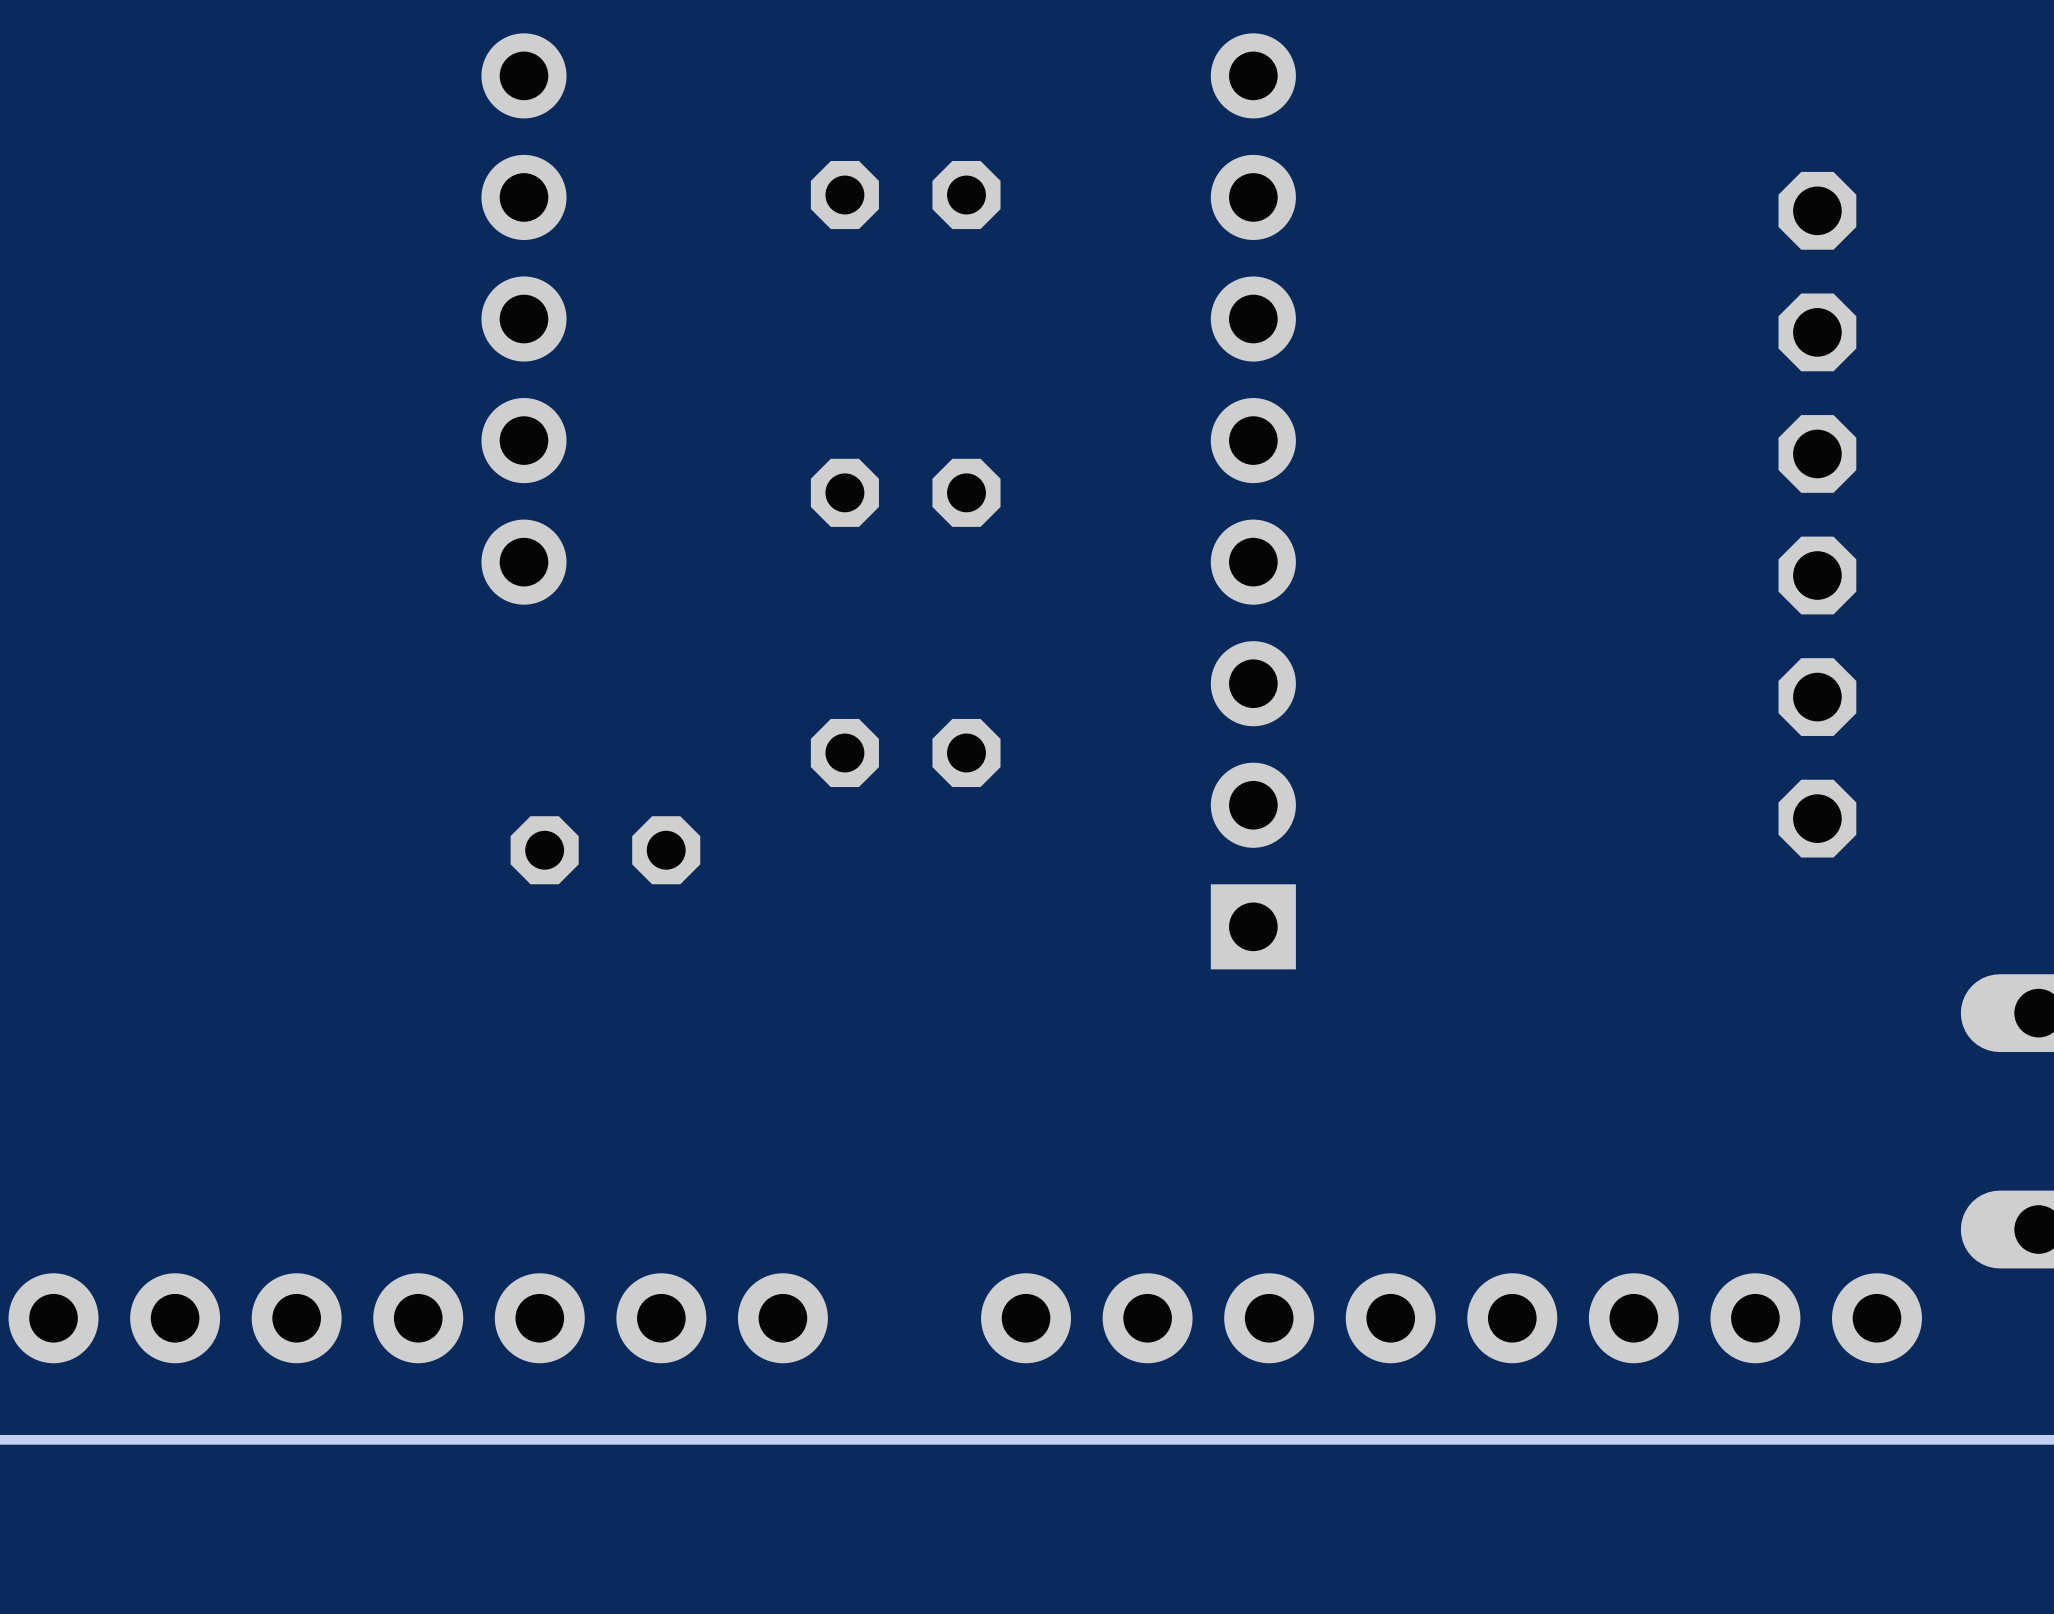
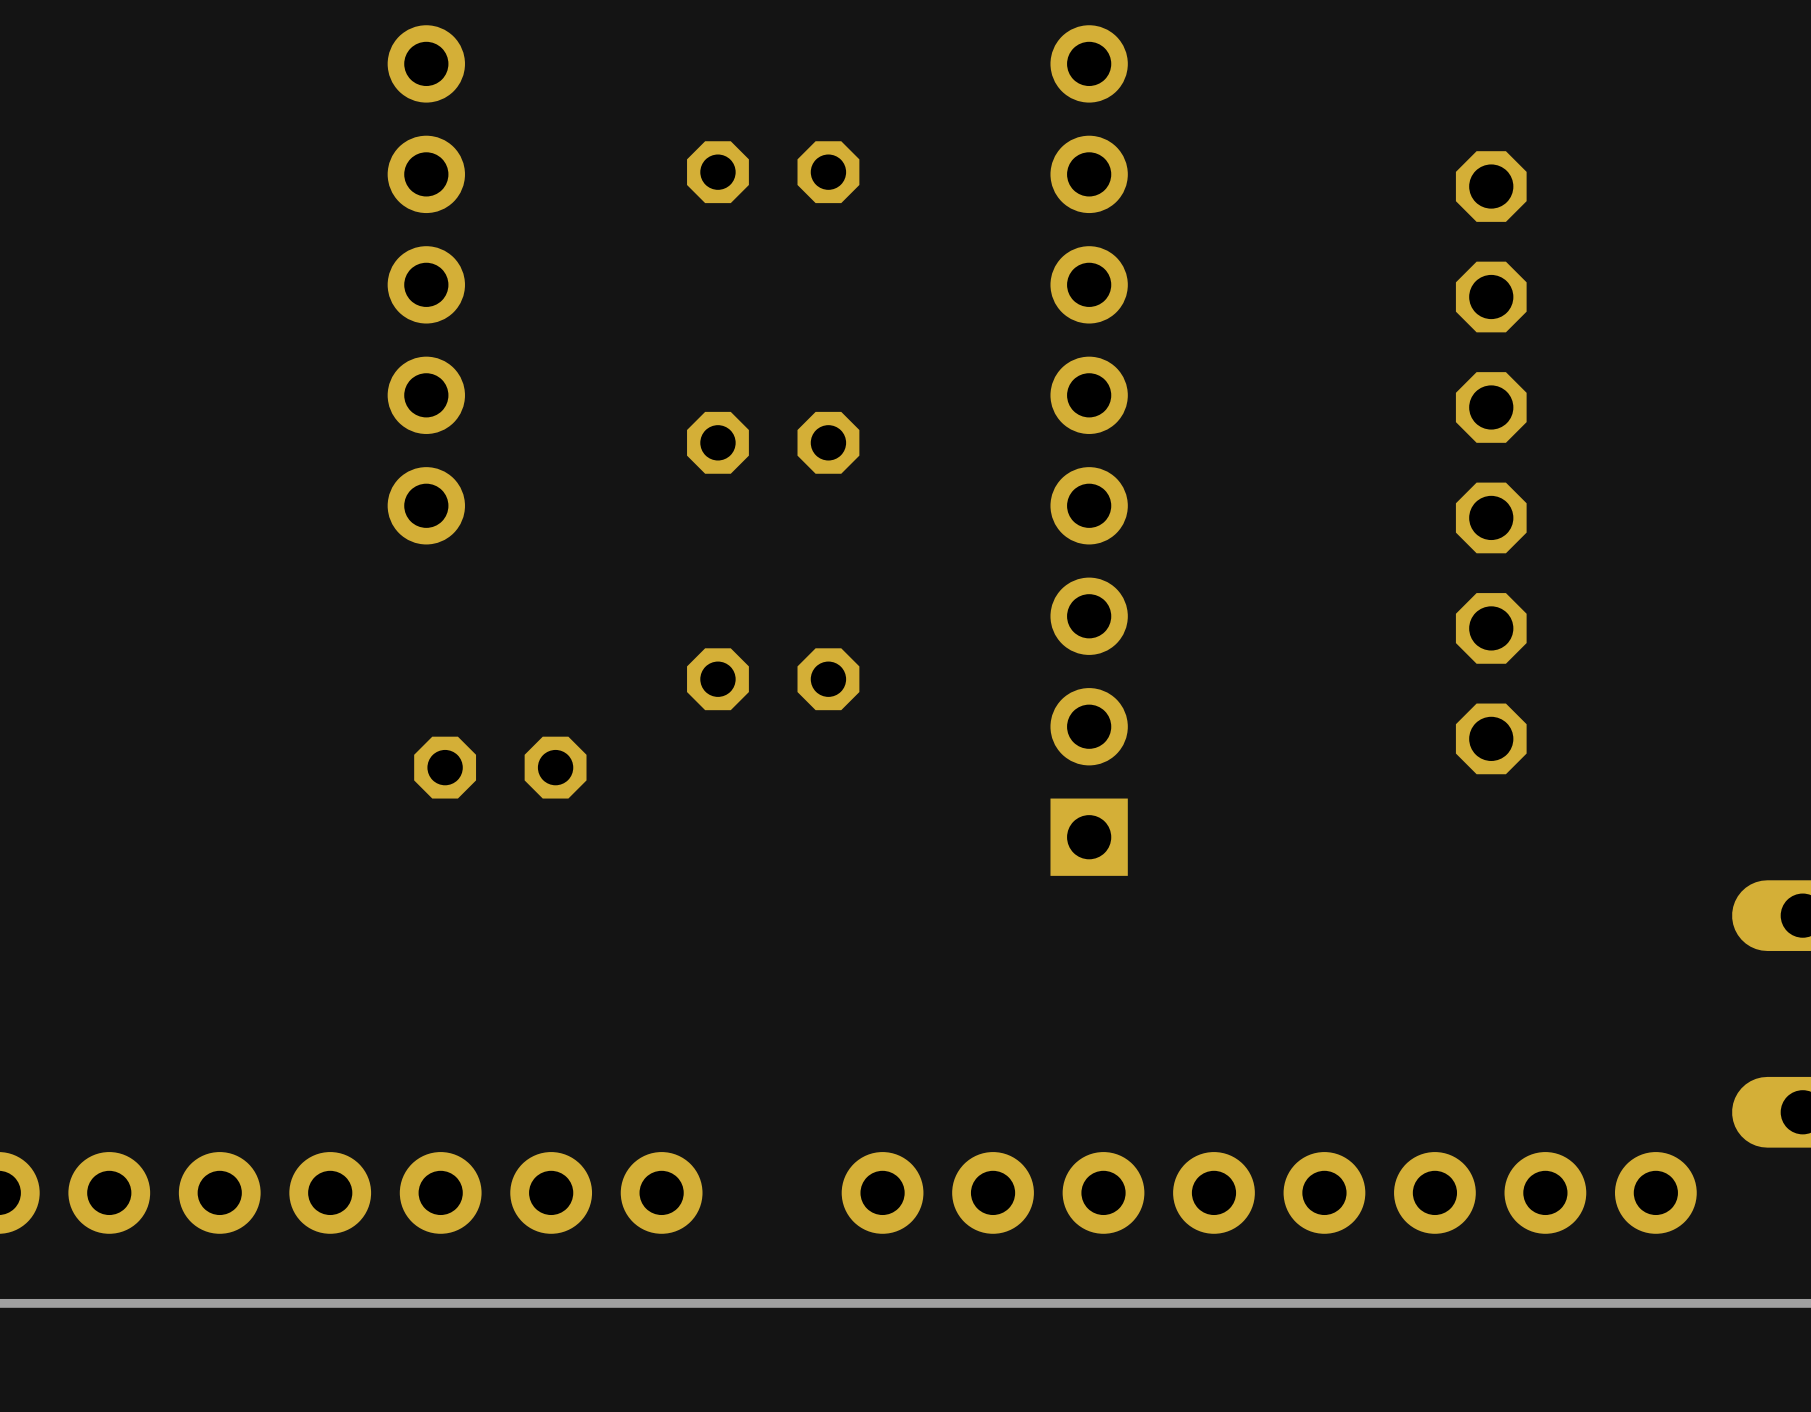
part position: (1817, 514) -> (1491, 462)

